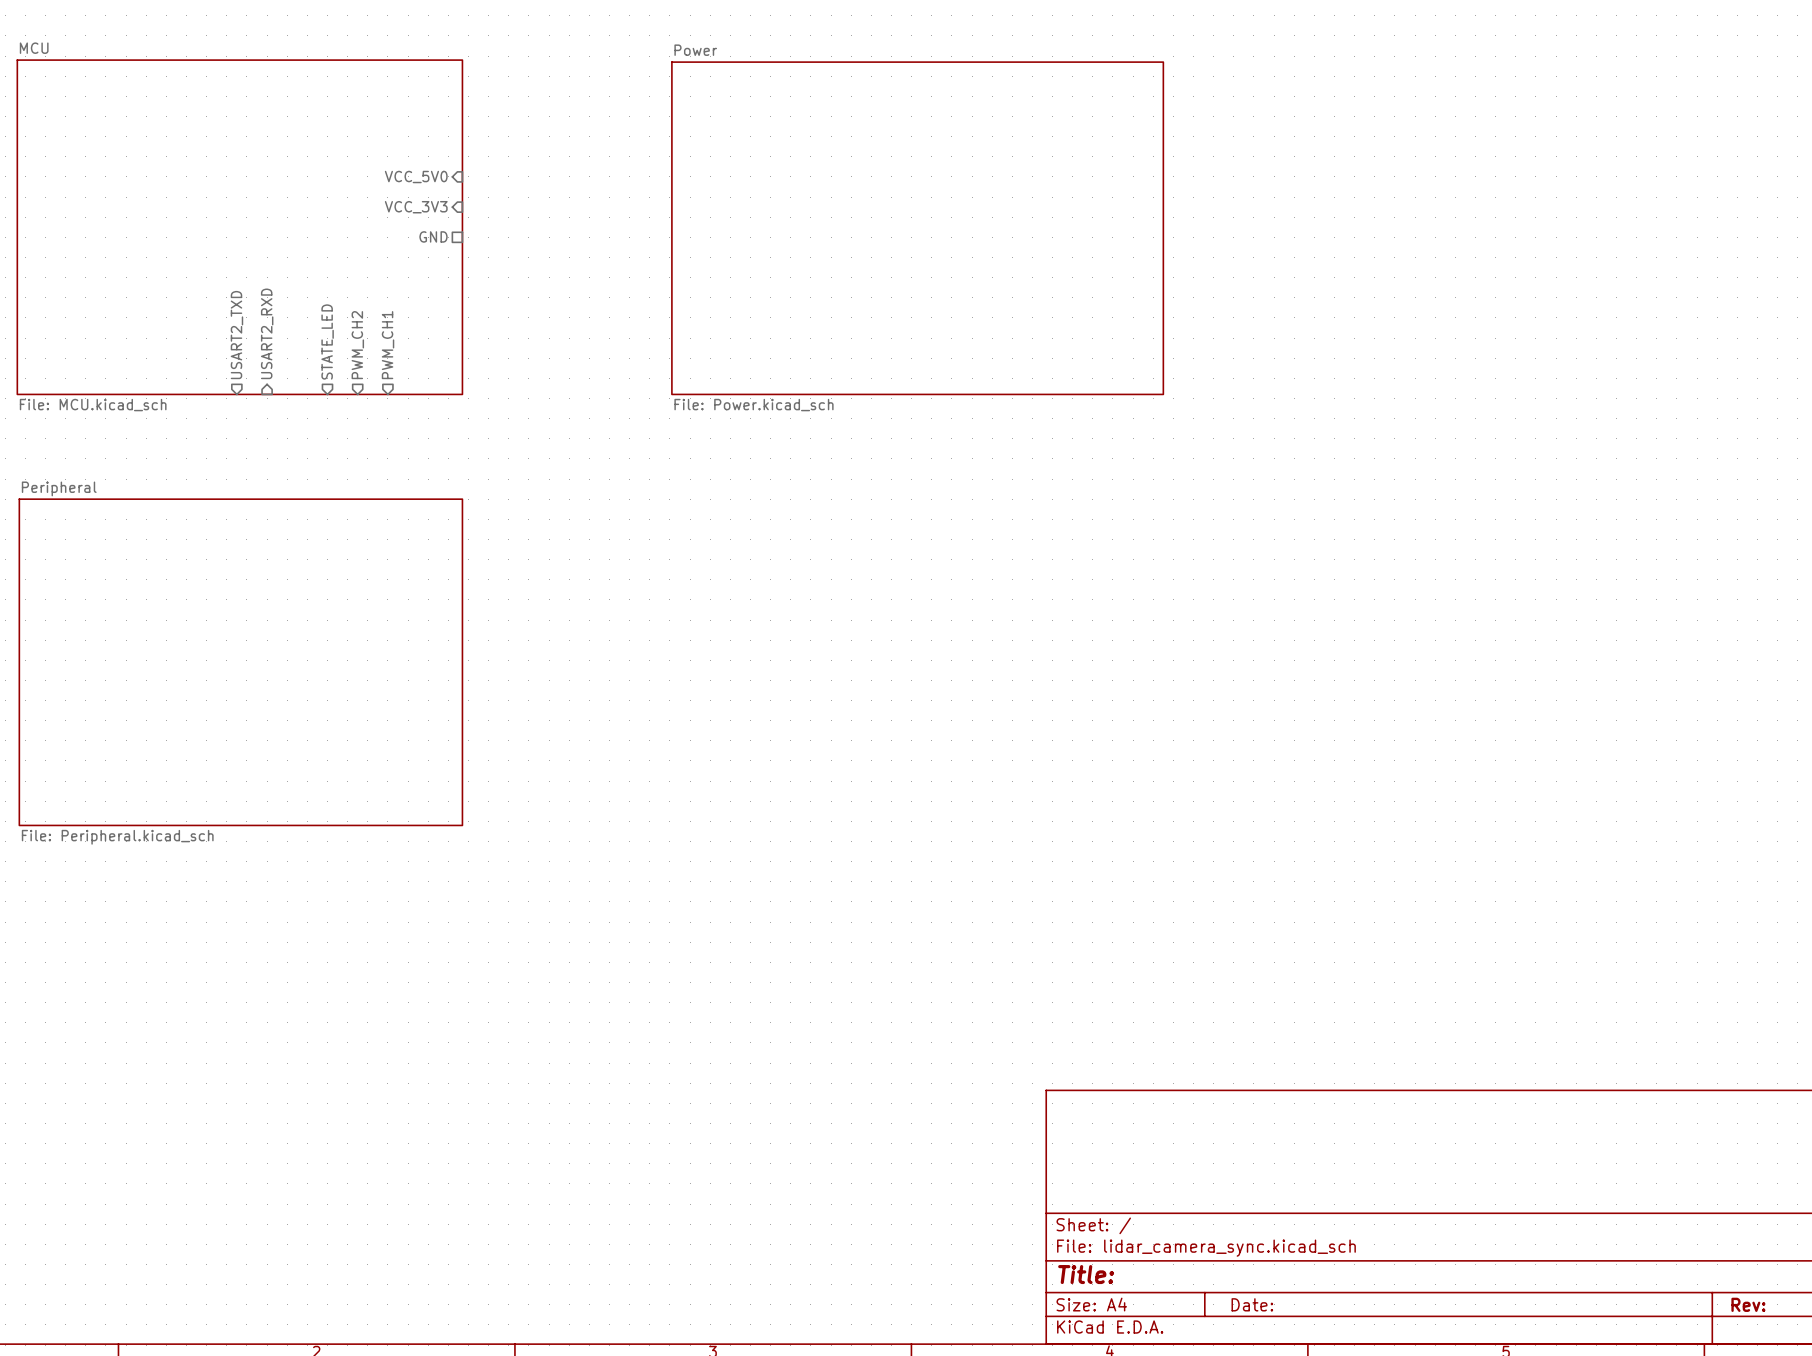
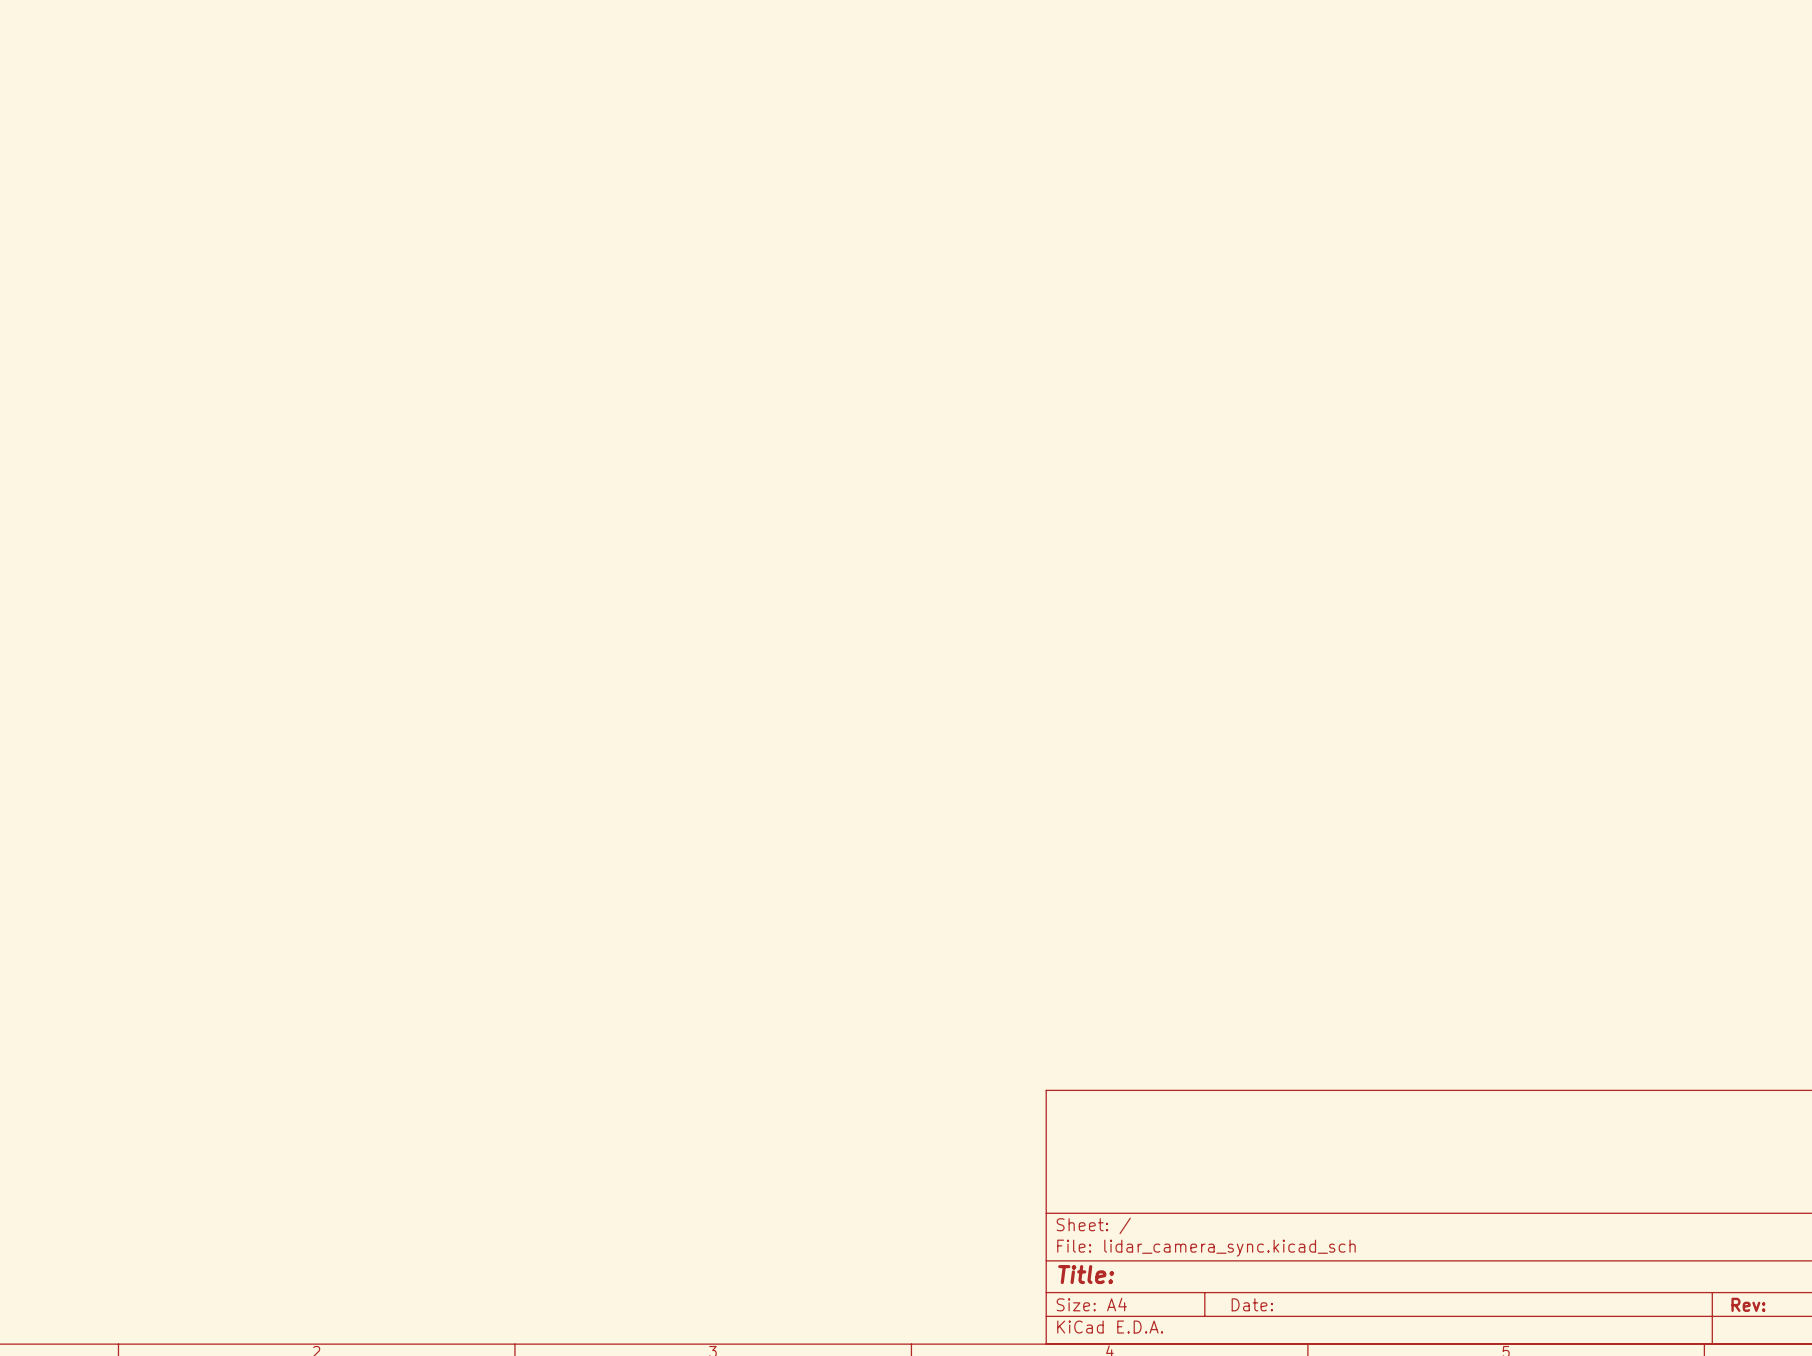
sheet pin: VCC_5V0 (416, 177) -> none
sheet pin: VCC_3V3 (416, 207) -> none
sheet MCU: File: MCU.kicad_sch (239, 227) -> none
sheet Power: File: Power.kicad_sch (917, 228) -> none
sheet pin: GND (433, 236) -> none
sheet pin: USART2_RXD (267, 333) -> none
sheet pin: USART2_TXD (236, 335) -> none
sheet pin: STATE_LED (327, 342) -> none
sheet pin: PWM_CH2 (357, 345) -> none
sheet pin: PWM_CH1 (388, 345) -> none
sheet Peripheral: File: Peripheral.kicad_sch (240, 662) -> none

